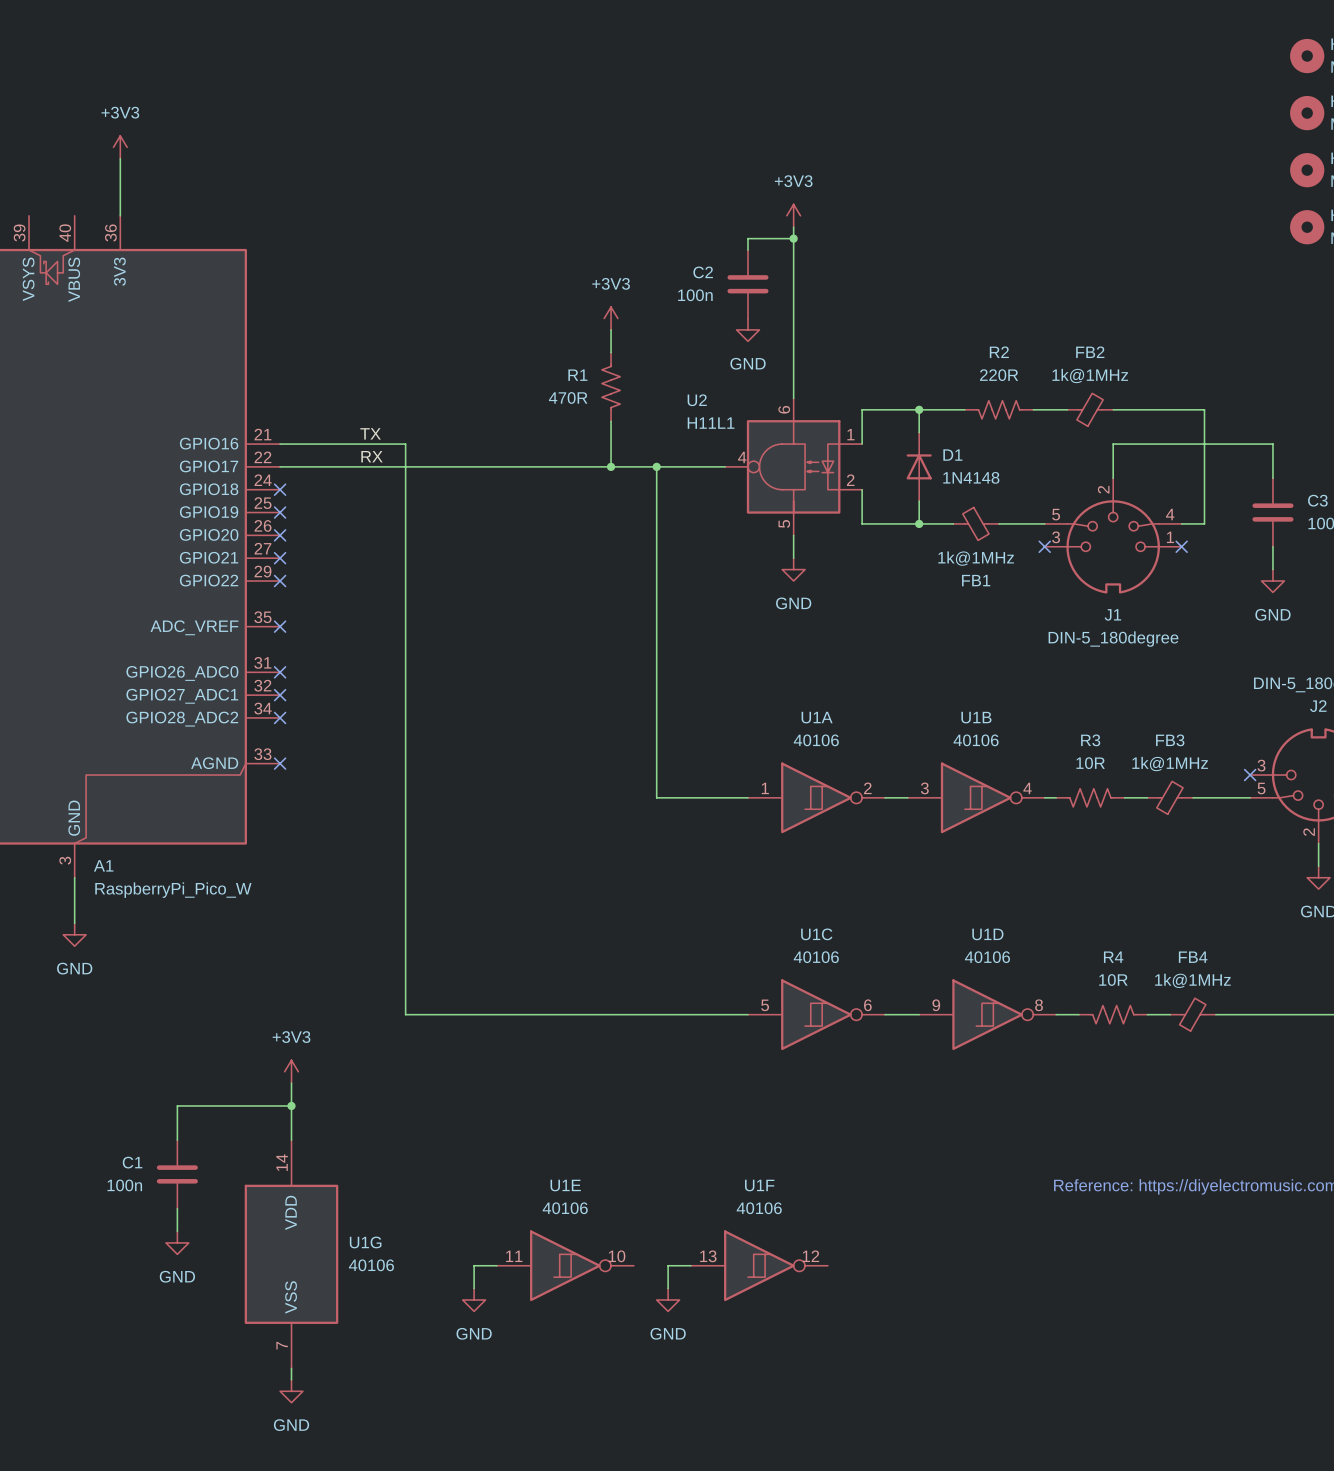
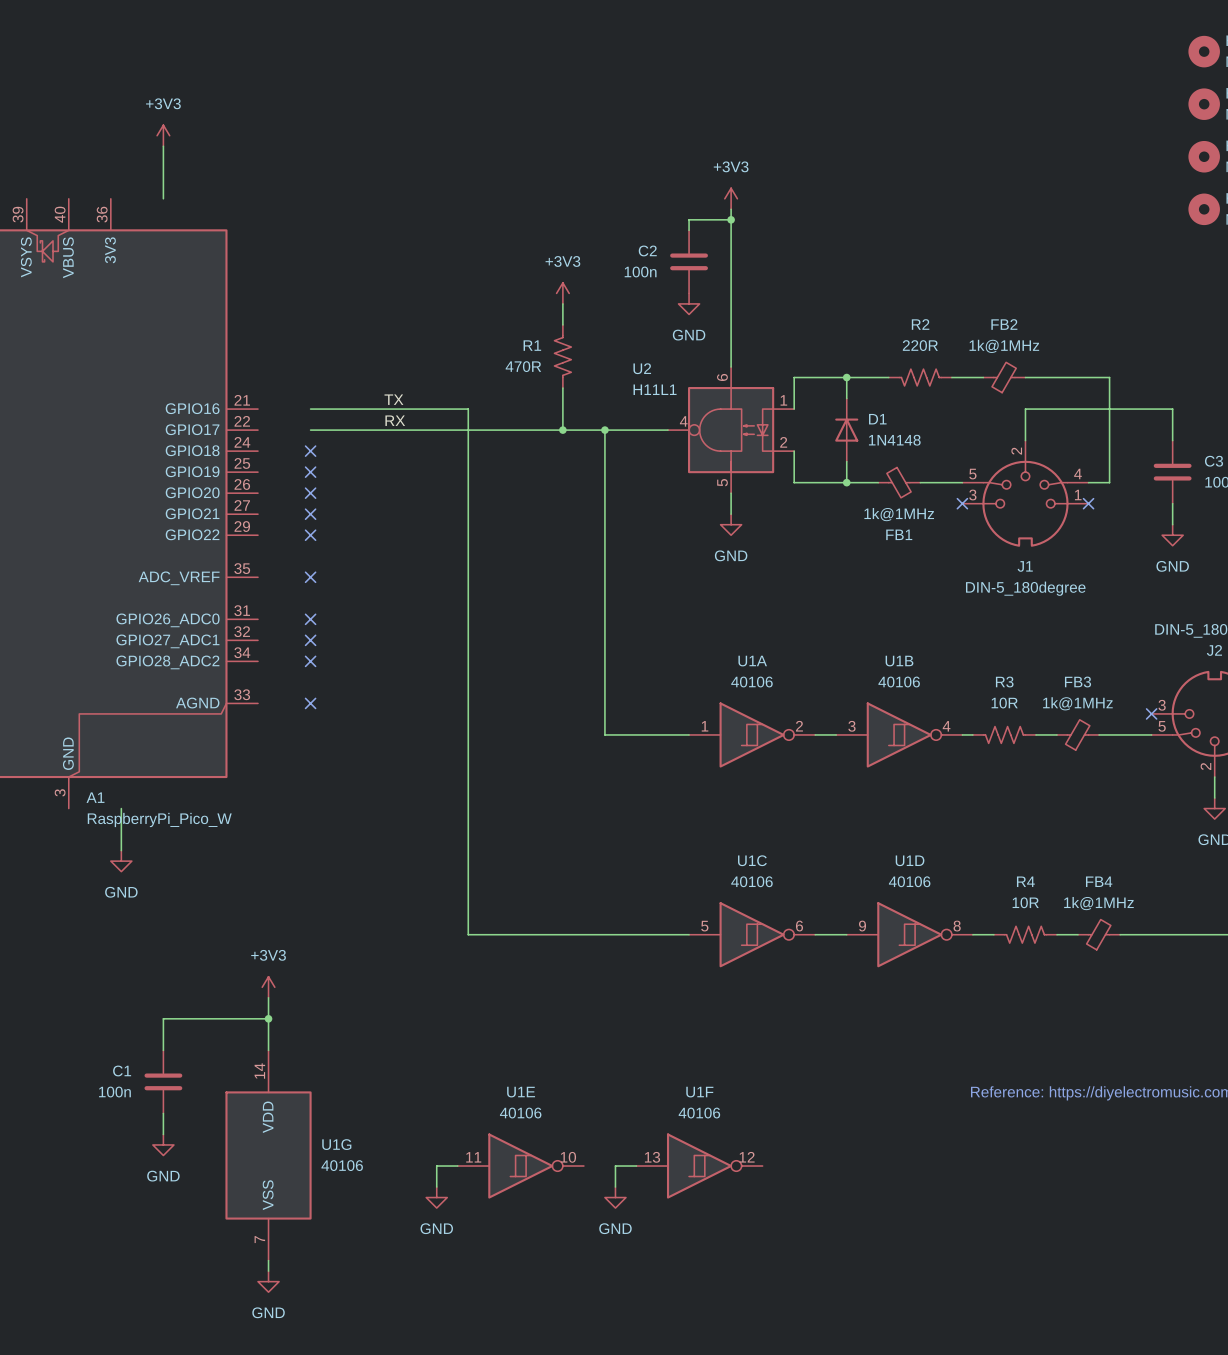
power symbol position: +3V3 (120, 147) -> +3V3 (163, 135)
wire: (120, 158) (120, 215) -> (163, 146) (163, 198)
label position: TX (370, 433) -> TX (393, 399)
wire: (280, 444) (337, 444) -> none
wire: (405, 444) (405, 1014) (508, 1014) -> (373, 409) (468, 409) (468, 934)
label position: RX (372, 456) -> RX (395, 420)
wire: (280, 466) (337, 466) -> none
no-connect mark: (280, 489) -> none
no-connect mark: none -> (310, 451)
no-connect mark: (280, 512) -> none
no-connect mark: none -> (310, 472)
no-connect mark: (280, 535) -> none
no-connect mark: none -> (310, 493)
no-connect mark: (280, 558) -> none
no-connect mark: none -> (310, 514)
no-connect mark: (280, 581) -> none
no-connect mark: none -> (310, 535)
no-connect mark: (280, 626) -> none
no-connect mark: none -> (310, 577)
no-connect mark: (280, 672) -> none
no-connect mark: none -> (310, 619)
no-connect mark: (280, 695) -> none
no-connect mark: none -> (310, 640)
no-connect mark: (280, 717) -> none
no-connect mark: none -> (310, 661)
no-connect mark: (280, 763) -> none
no-connect mark: none -> (310, 703)
wire: (74, 877) (74, 923) -> (121, 808) (121, 850)
power symbol position: GND (74, 934) -> GND (121, 861)

